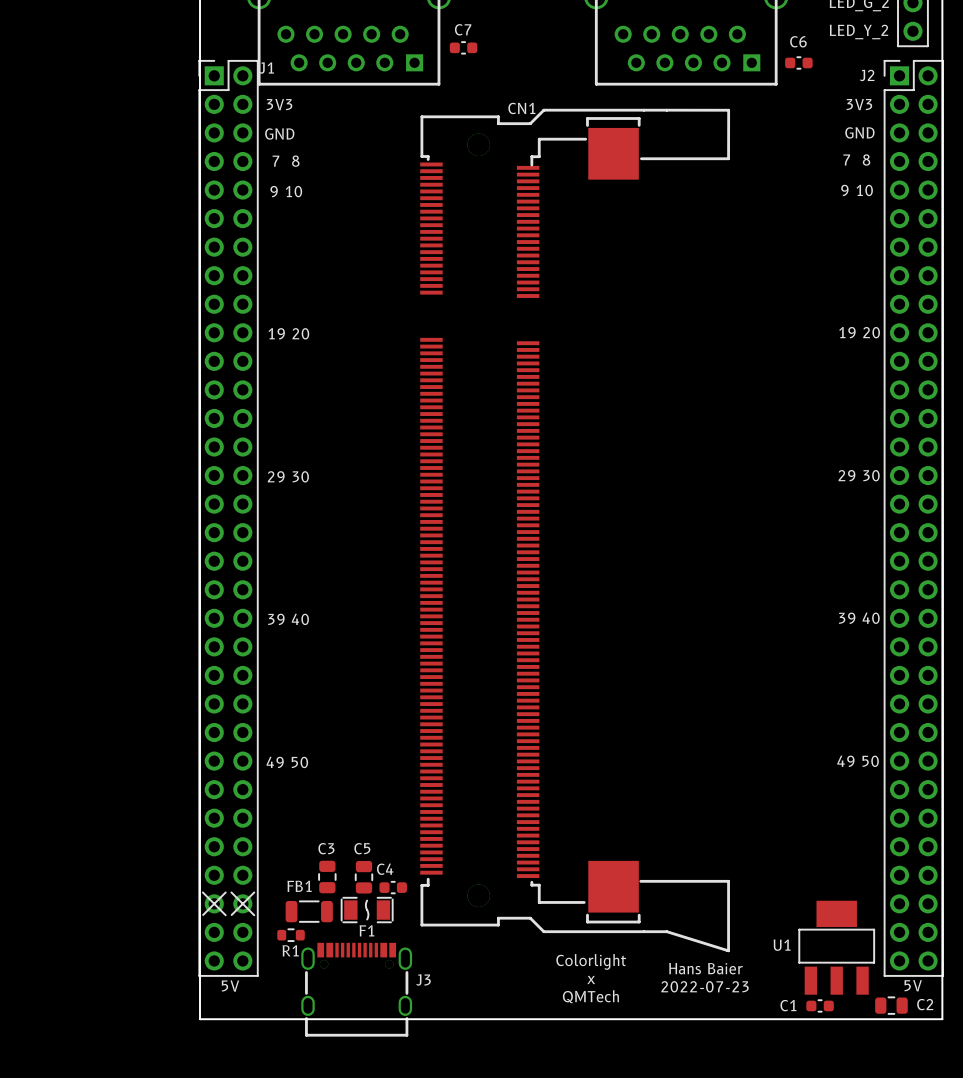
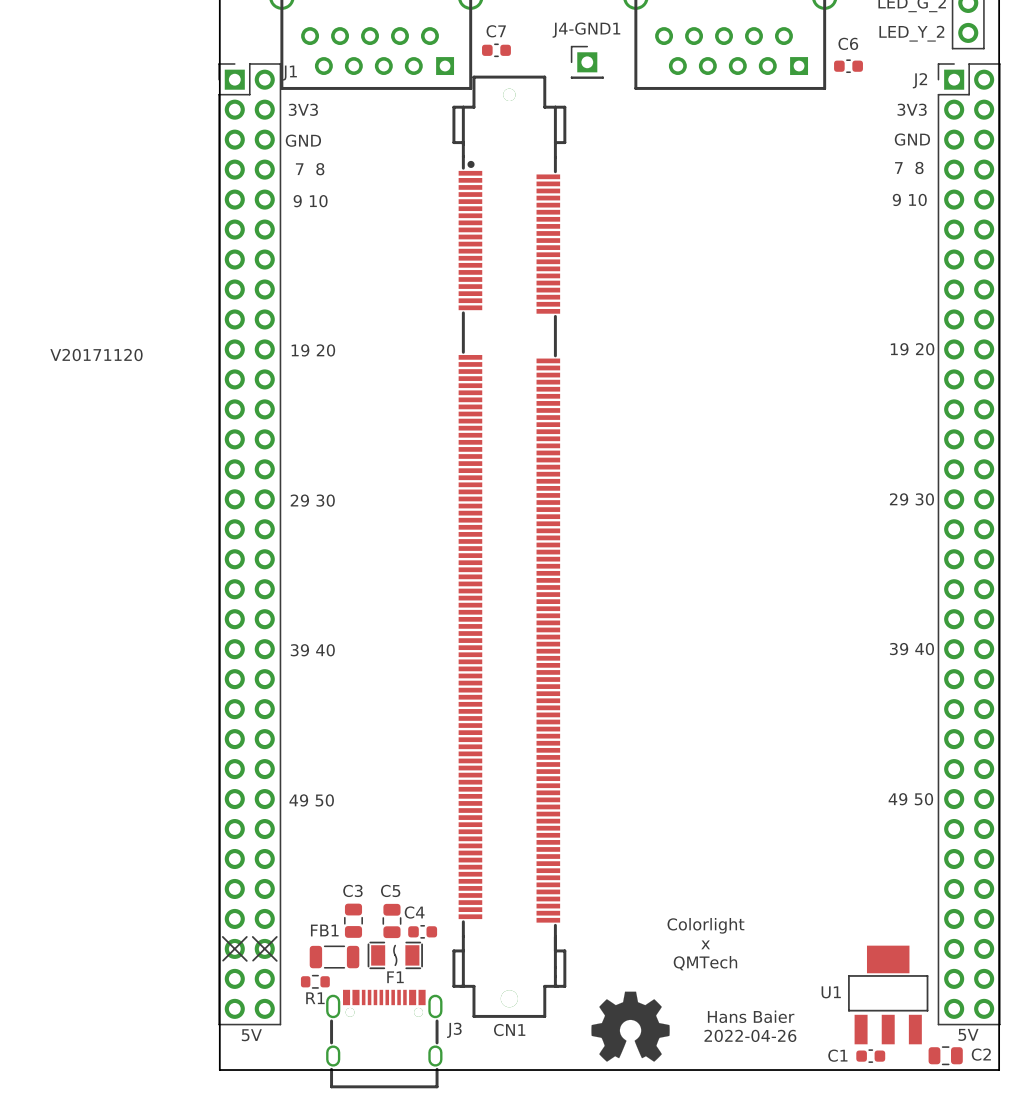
J4-GND1: none -> (587, 62)
CN1 footprint: [420, 108, 731, 953] -> [452, 75, 567, 1018]
CN1 name position: CN1 (521, 108) -> CN1 (509, 1030)
drawing: none -> [50, 348, 143, 362]
drawing: none -> [591, 991, 670, 1062]
text position: Colorlight (591, 961) -> Colorlight (705, 925)
text position: x (591, 979) -> x (705, 944)
text: 2022-07-23 (705, 986) -> 2022-04-26 (750, 1035)
text position: QMTech (590, 996) -> QMTech (705, 963)

